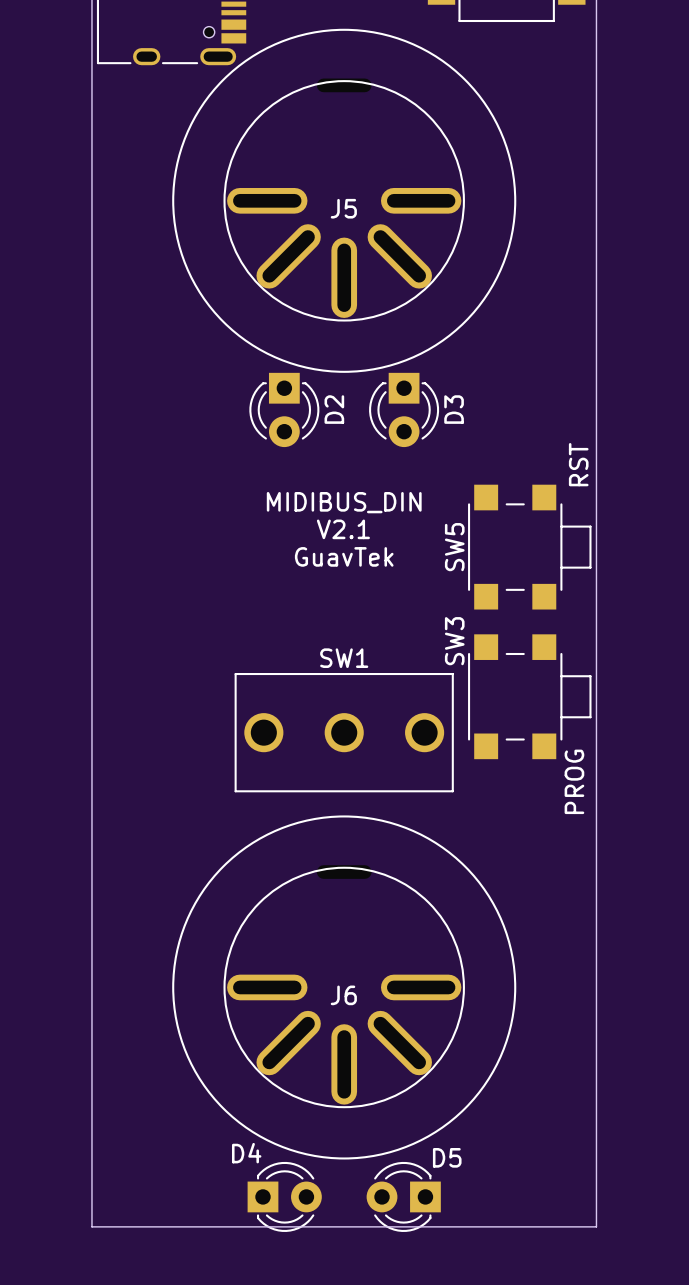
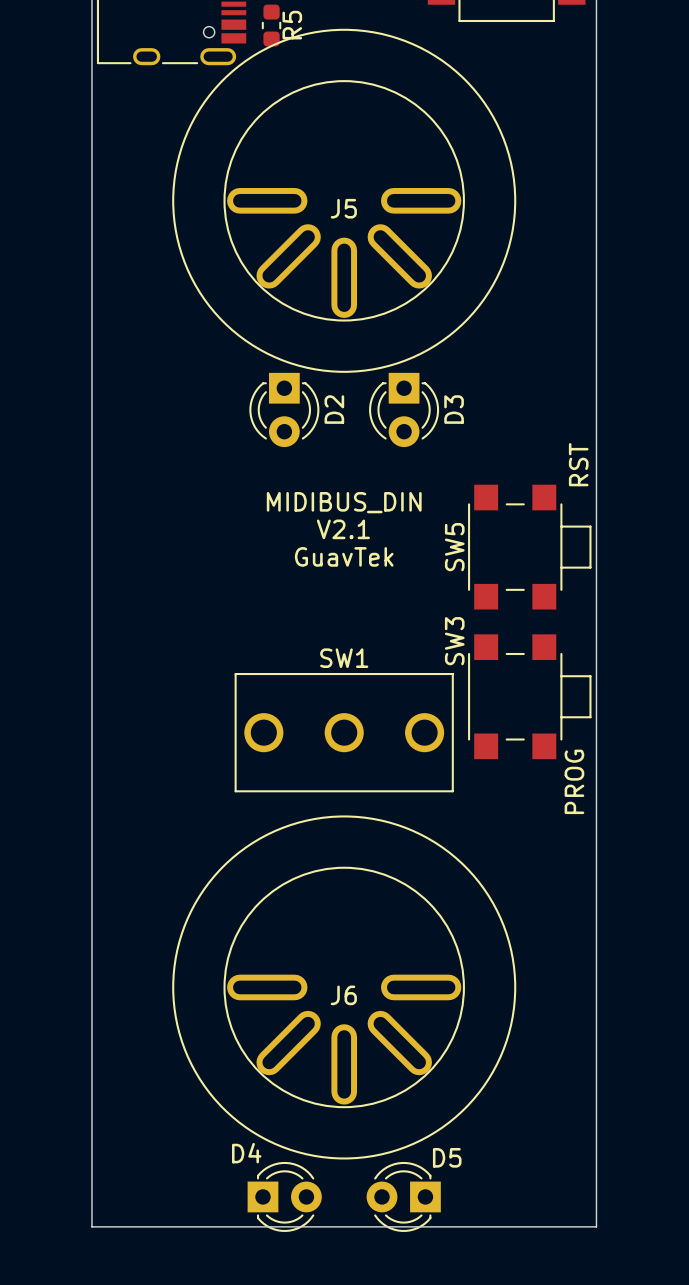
R5: none -> (271, 25)

